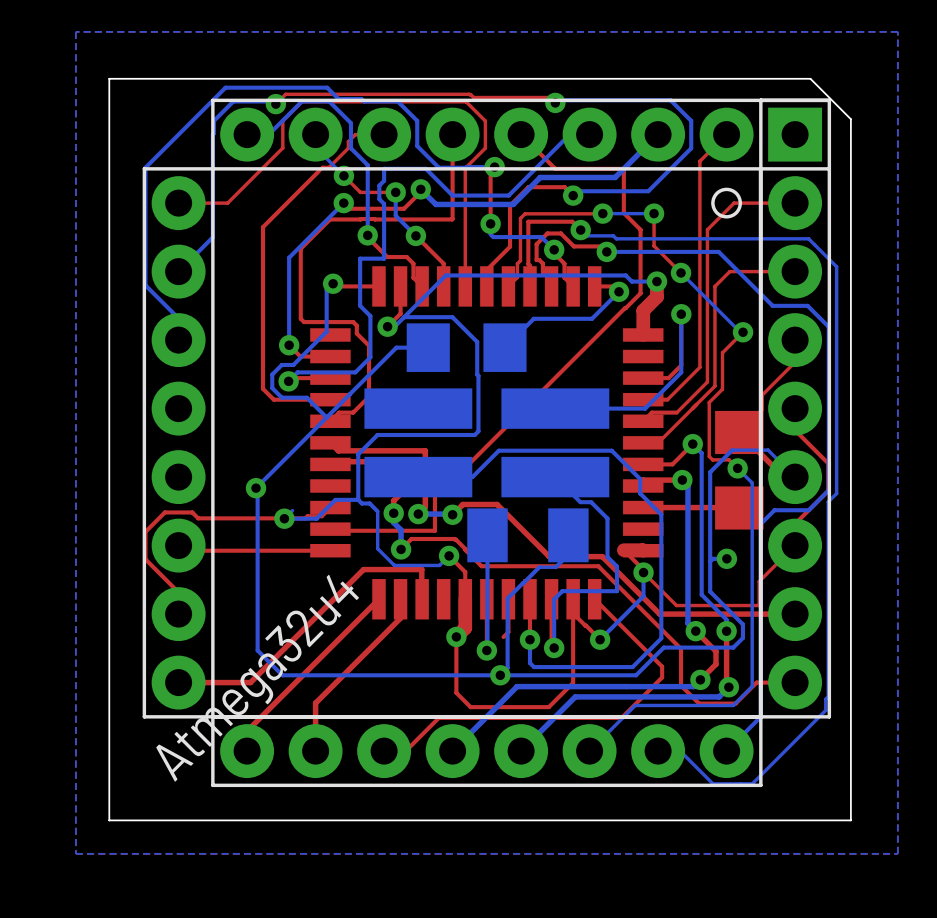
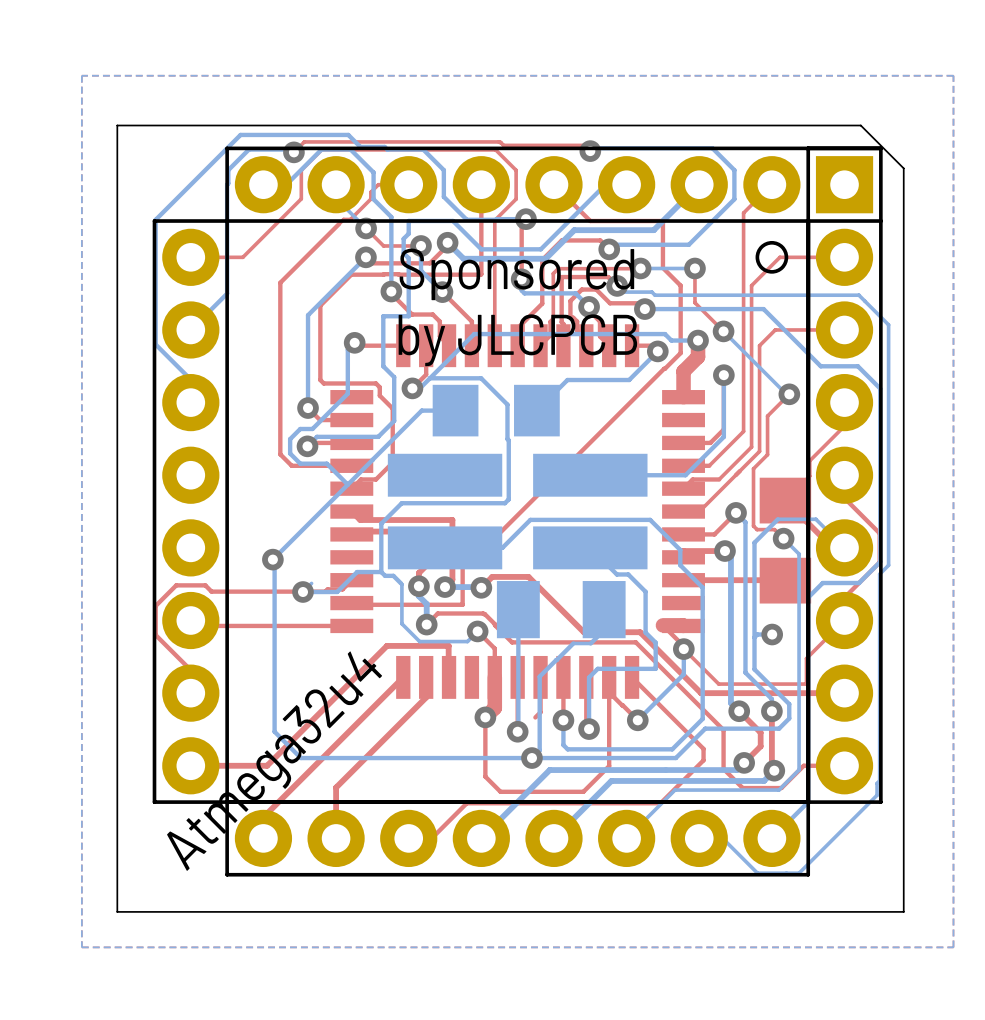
text: none -> Sponsored (516, 274)
text: none -> by JLCPCB (517, 340)

